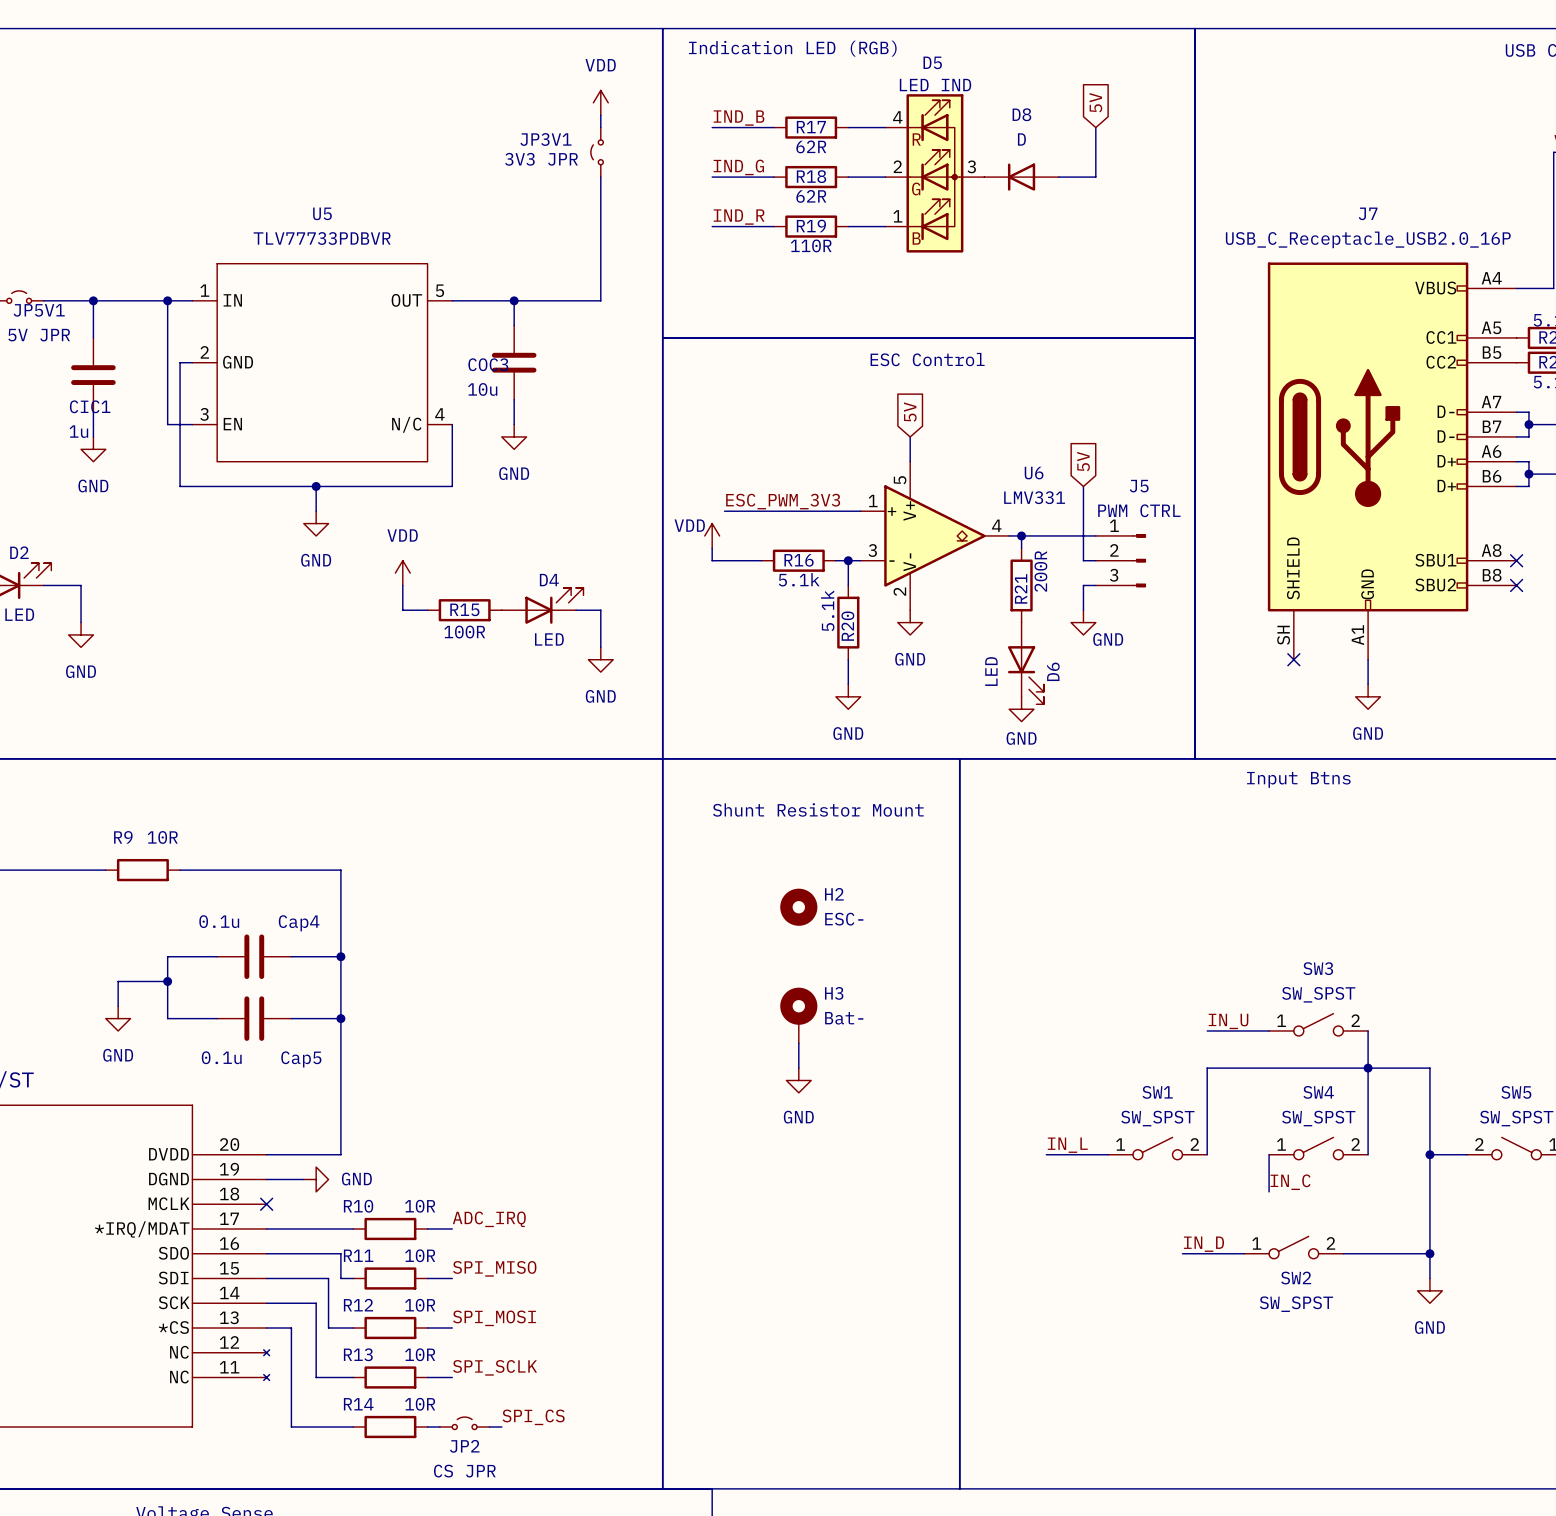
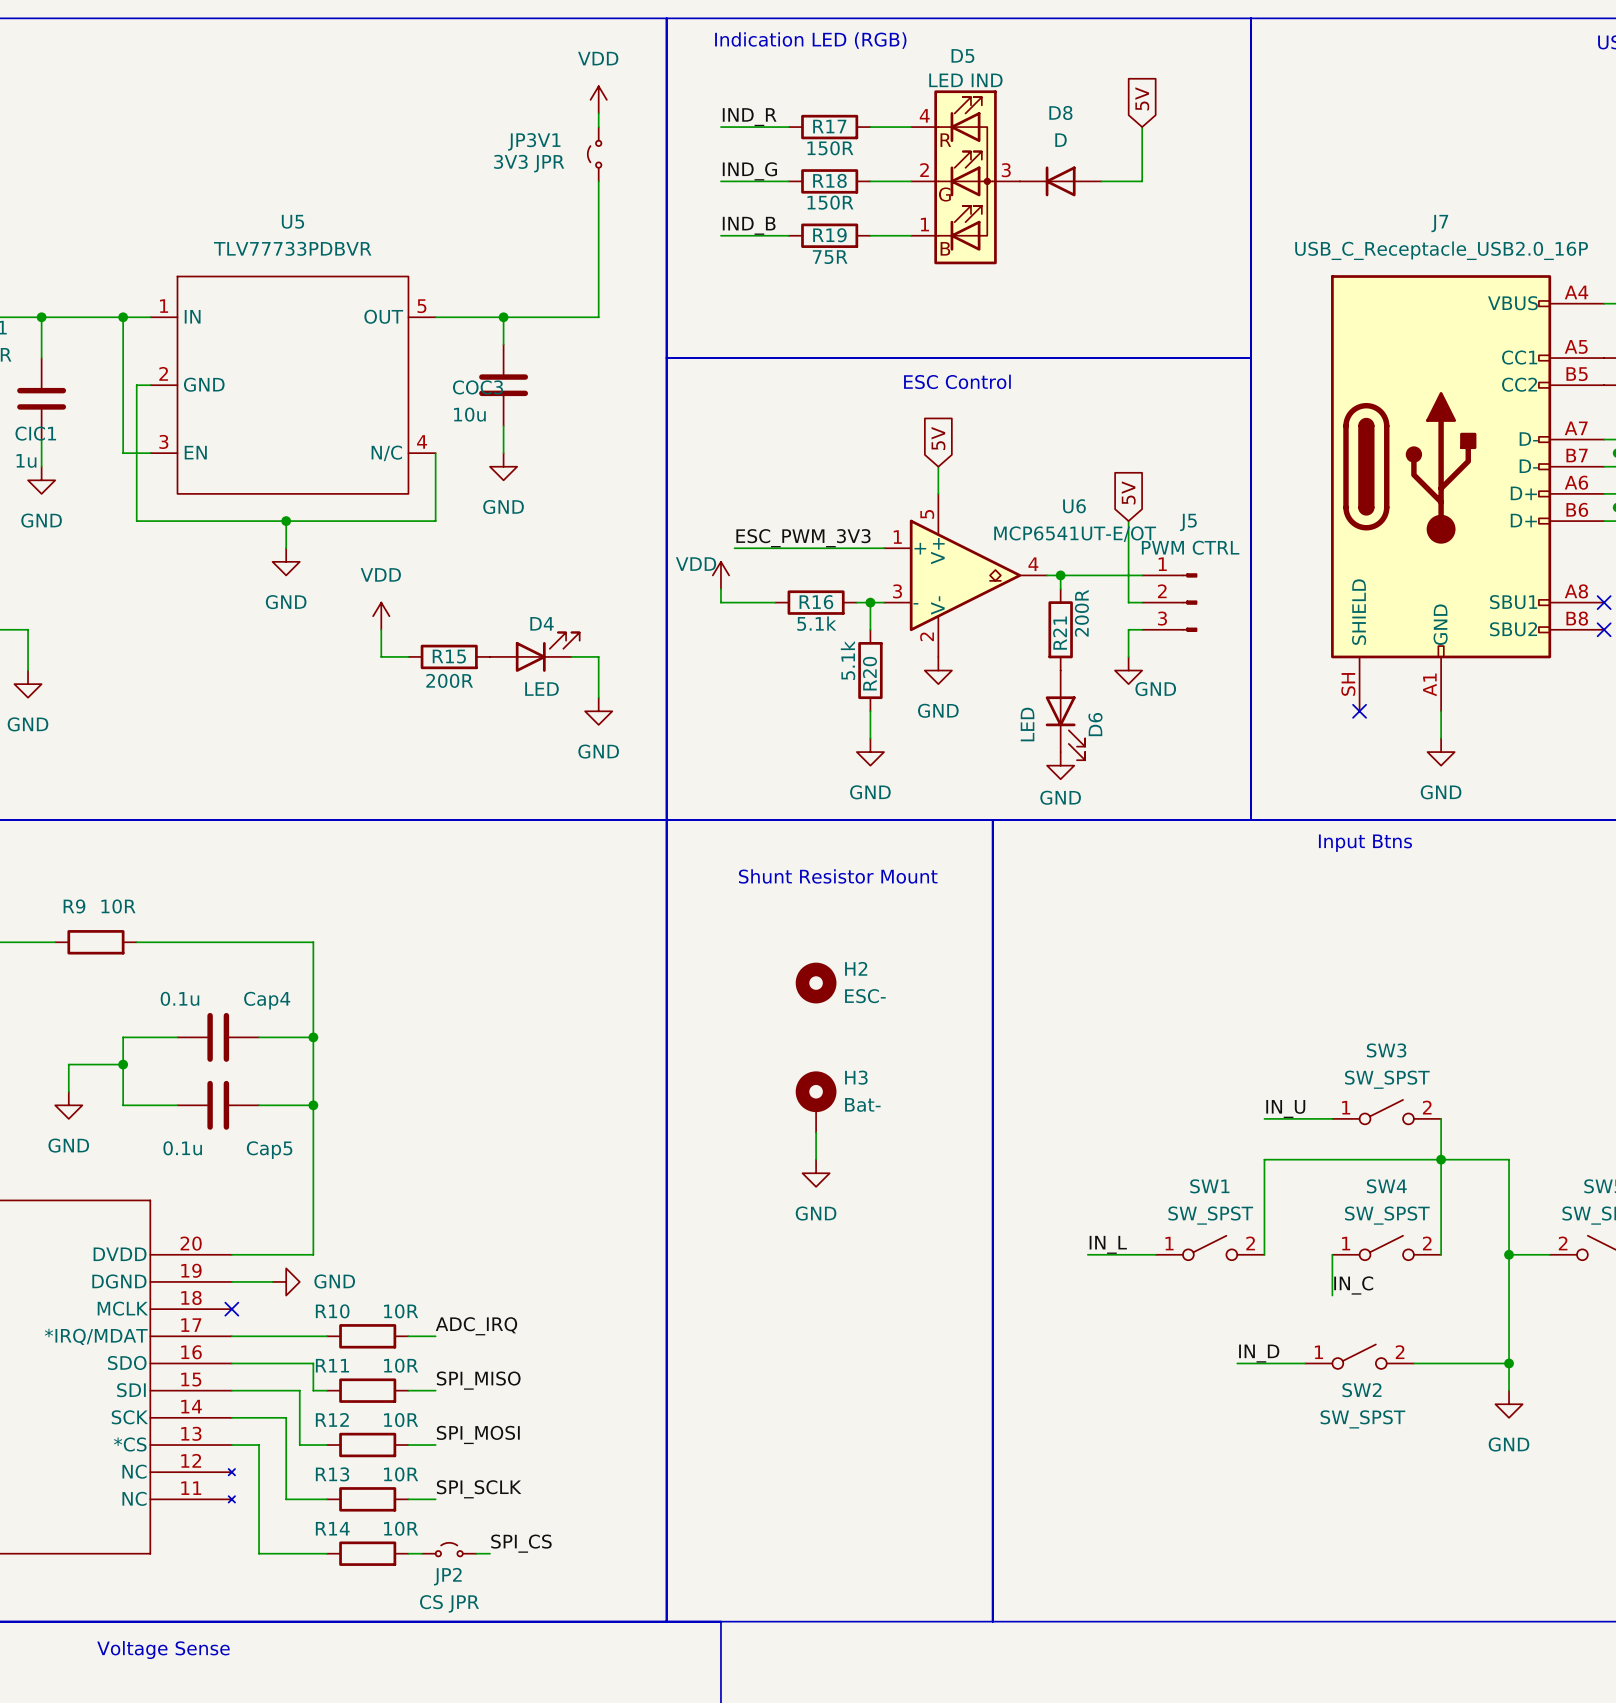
label: IND_B (739, 118) -> IND_R (749, 117)
R17 value: 62R (811, 146) -> 150R (830, 148)
R18 value: 62R (811, 196) -> 150R (830, 202)
label: IND_R (739, 217) -> IND_B (749, 225)
R19 value: 110R (811, 245) -> 75R (830, 257)
U6 value: LMV331 (1034, 497) -> MCP6541UT-E/OT (1075, 534)
R15 value: 100R (464, 632) -> 200R (449, 680)

